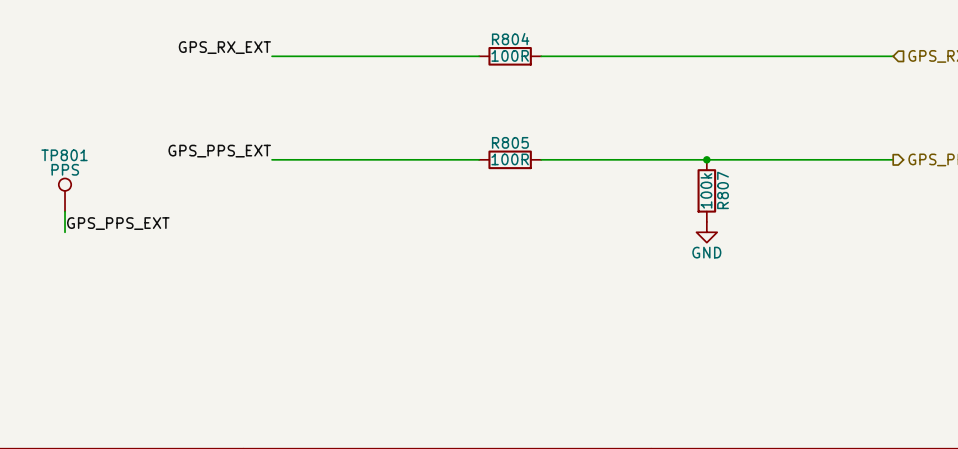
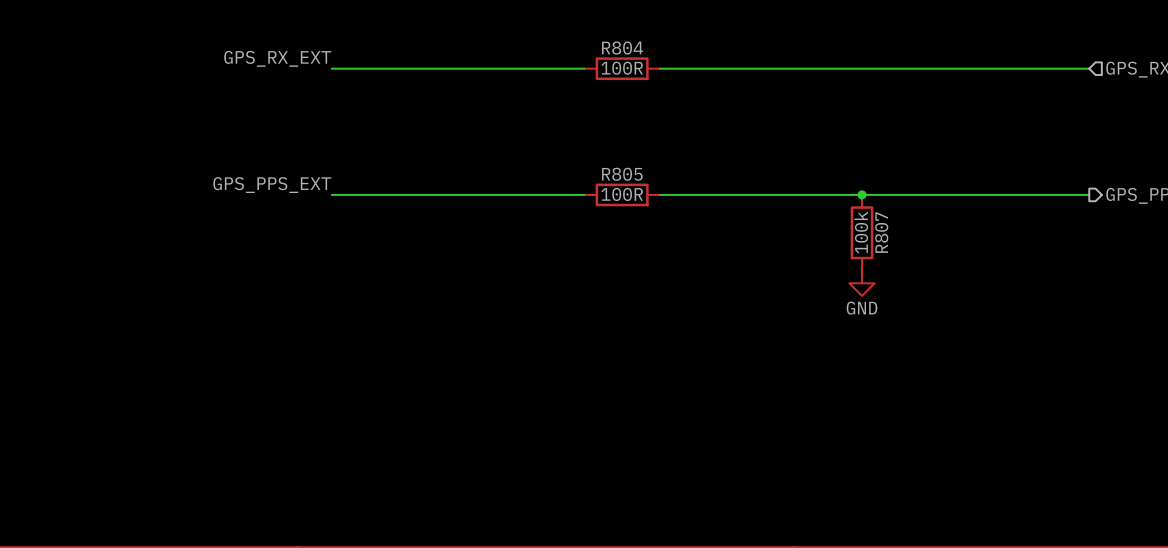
TP801: PPS (65, 195) -> none
wire: (65, 211) (65, 232) -> none
label: GPS_PPS_EXT (118, 223) -> none

